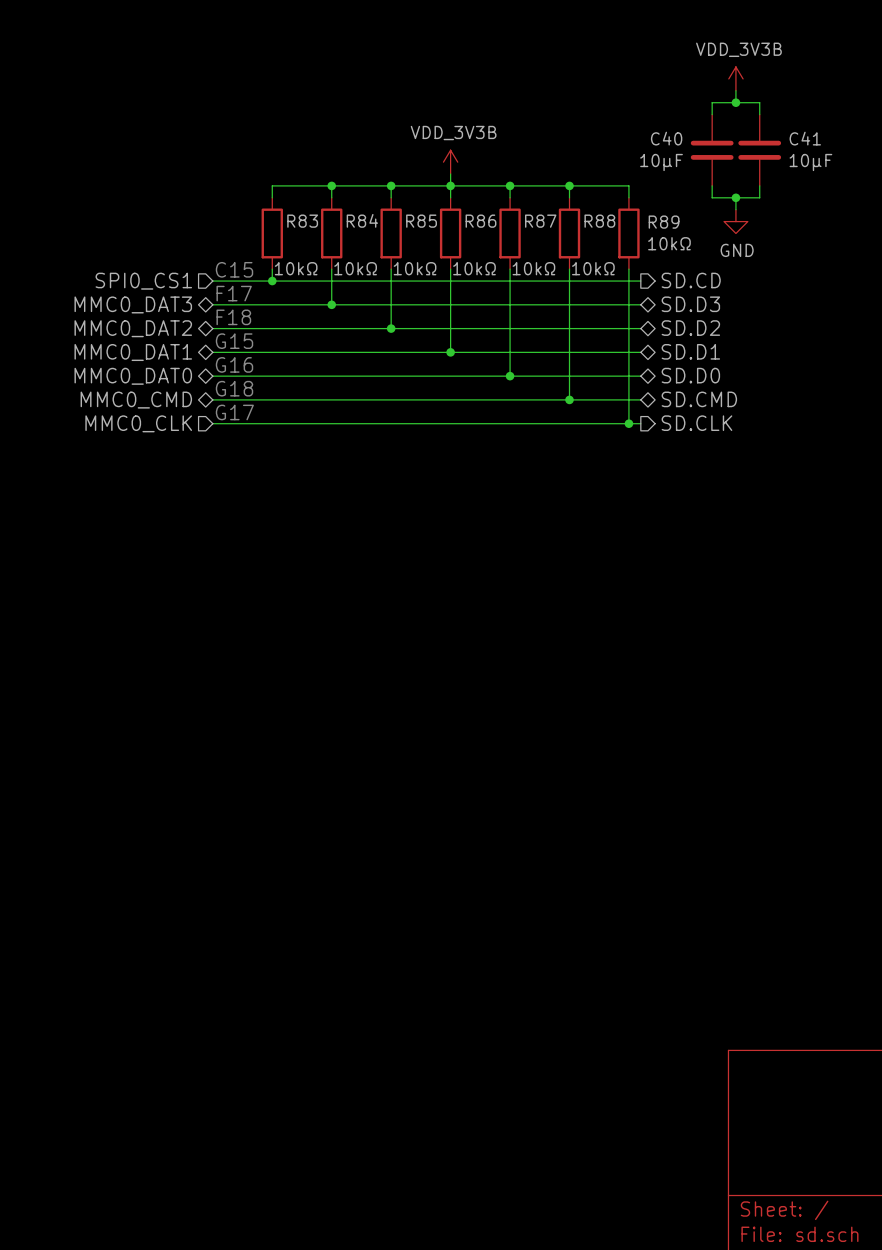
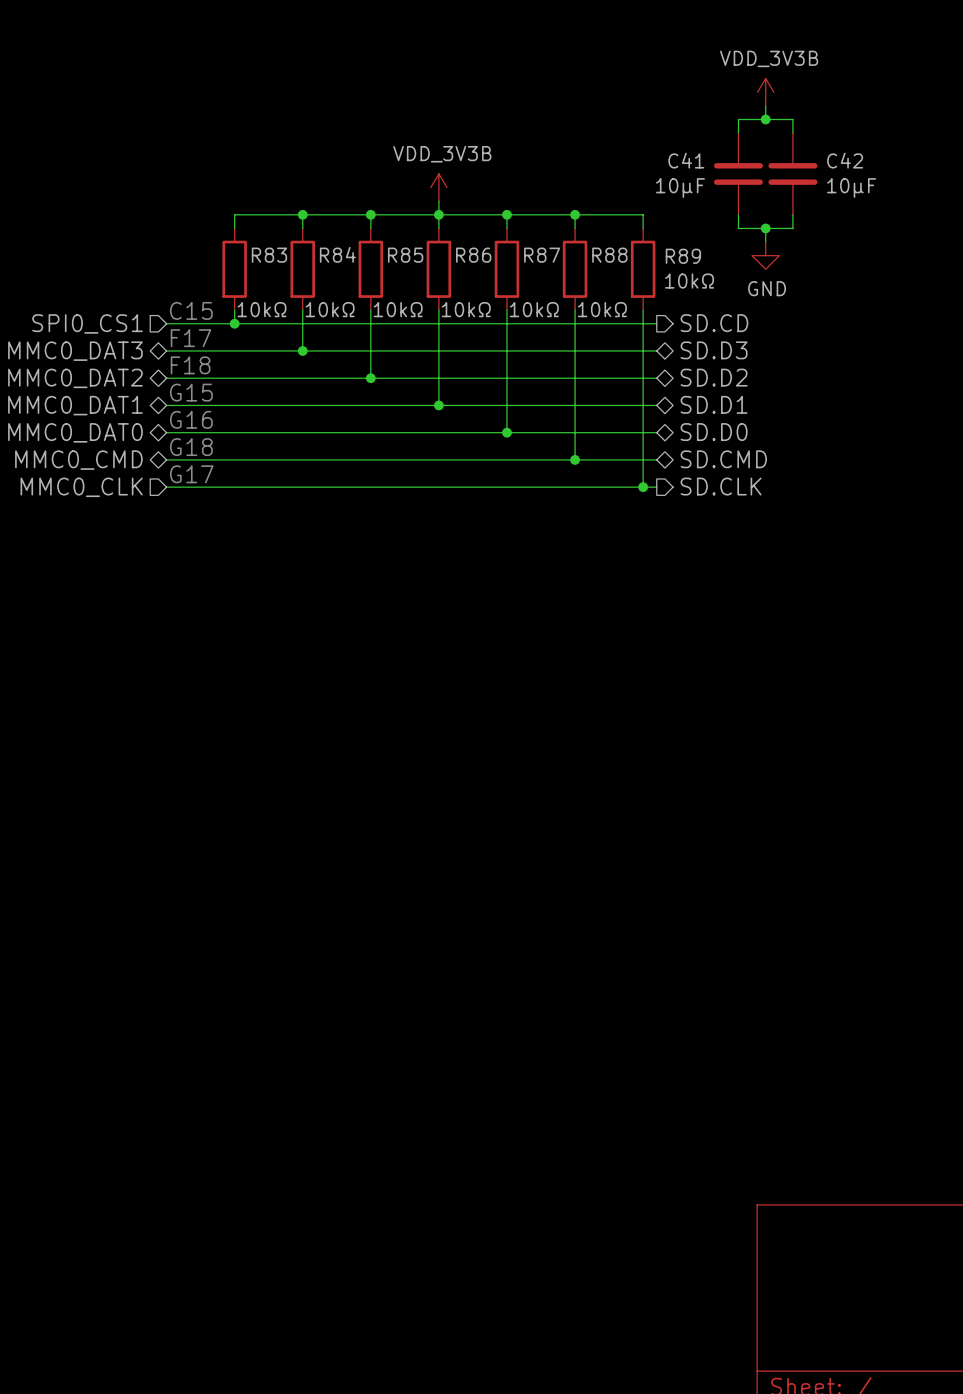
C40 name: C40 (666, 138) -> C41 (686, 160)
C41 name: C41 (805, 138) -> C42 (845, 160)

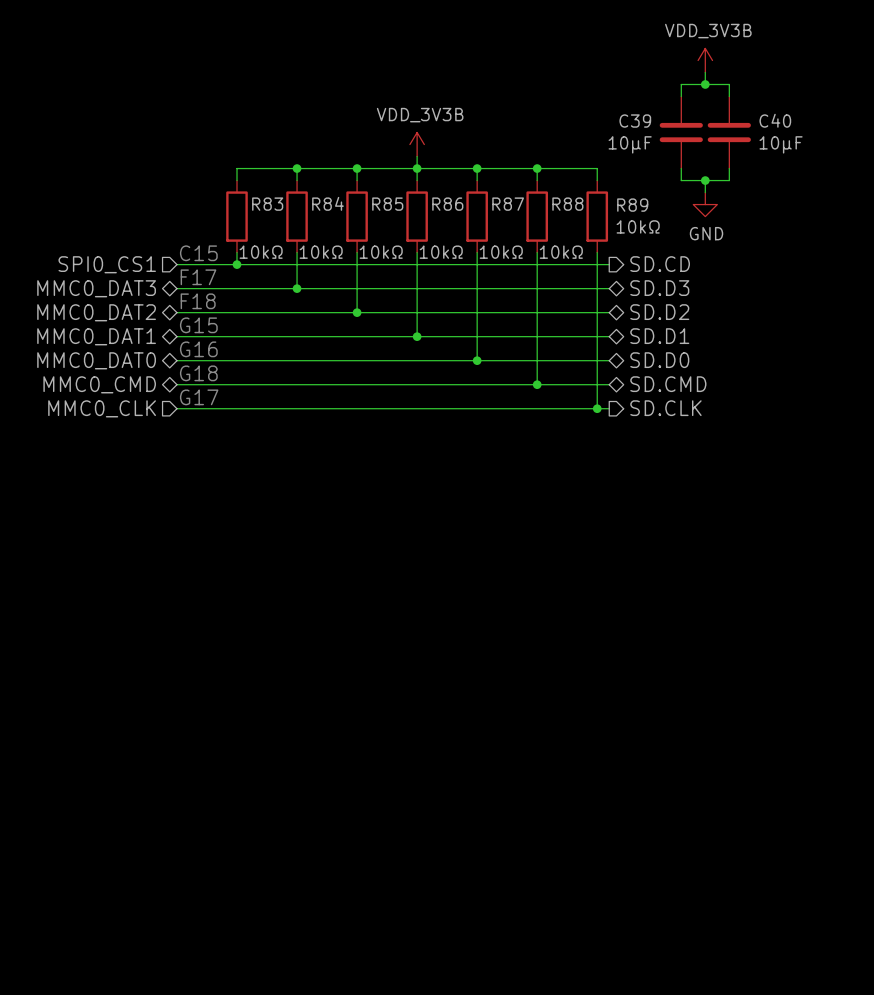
C41 name: C41 (686, 160) -> C39 (635, 121)
C42 name: C42 (845, 160) -> C40 (775, 120)

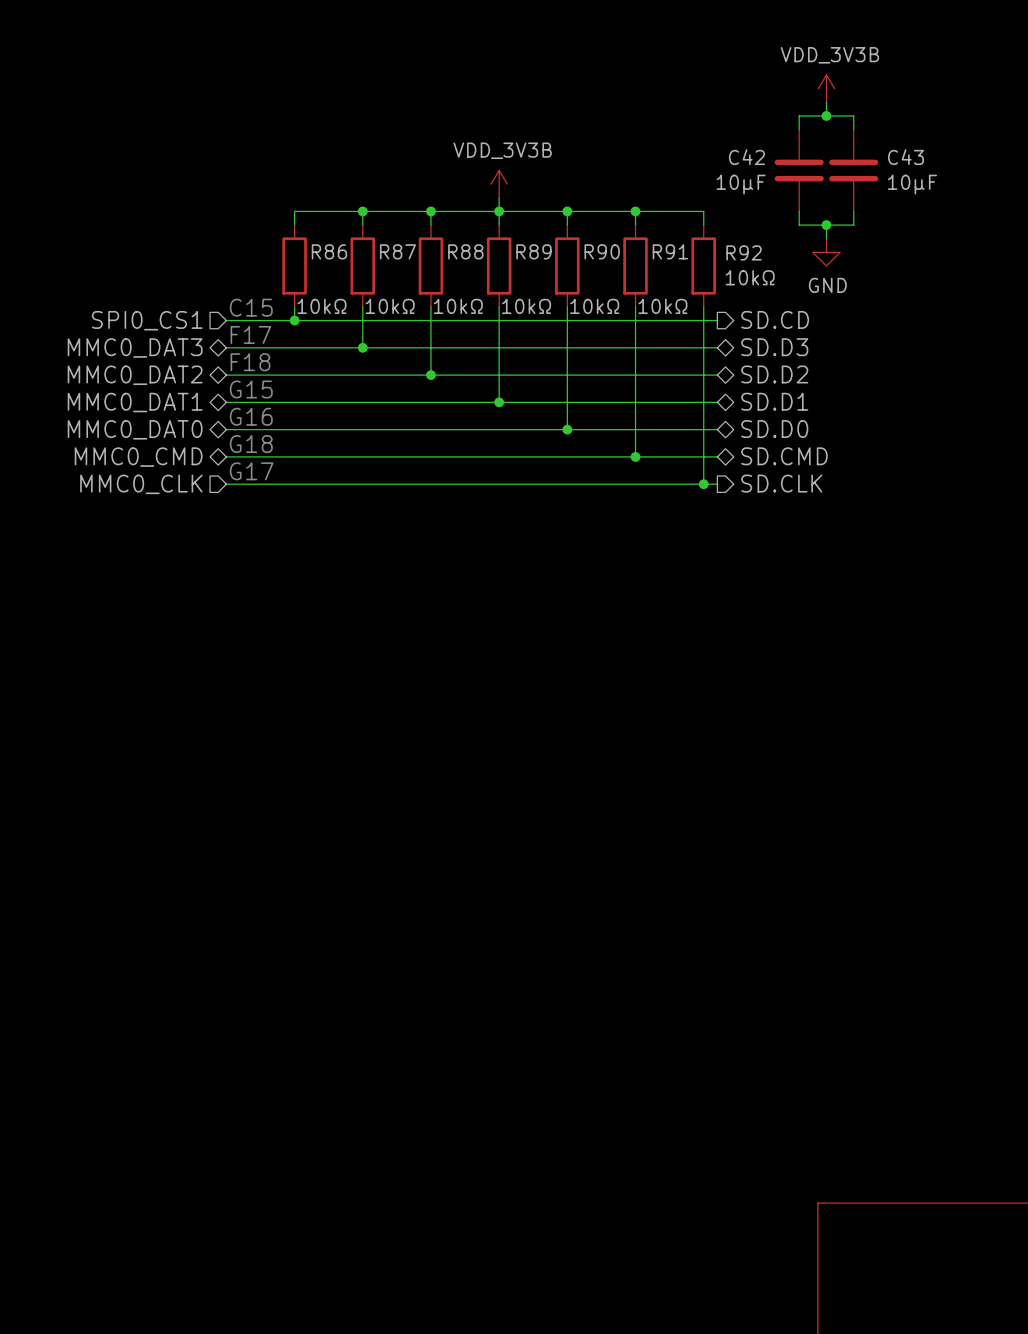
C40 name: C40 (775, 120) -> C43 (905, 157)
C39 name: C39 (635, 121) -> C42 (746, 157)
R84 name: R84 (328, 203) -> R87 (397, 251)
R83 name: R83 (267, 204) -> R86 (329, 251)
R85 name: R85 (387, 204) -> R88 (465, 251)
R86 name: R86 (447, 204) -> R89 (534, 251)
R87 name: R87 (508, 204) -> R90 (602, 251)
R88 name: R88 (567, 204) -> R91 (670, 251)
R89 name: R89 (632, 205) -> R92 (744, 252)

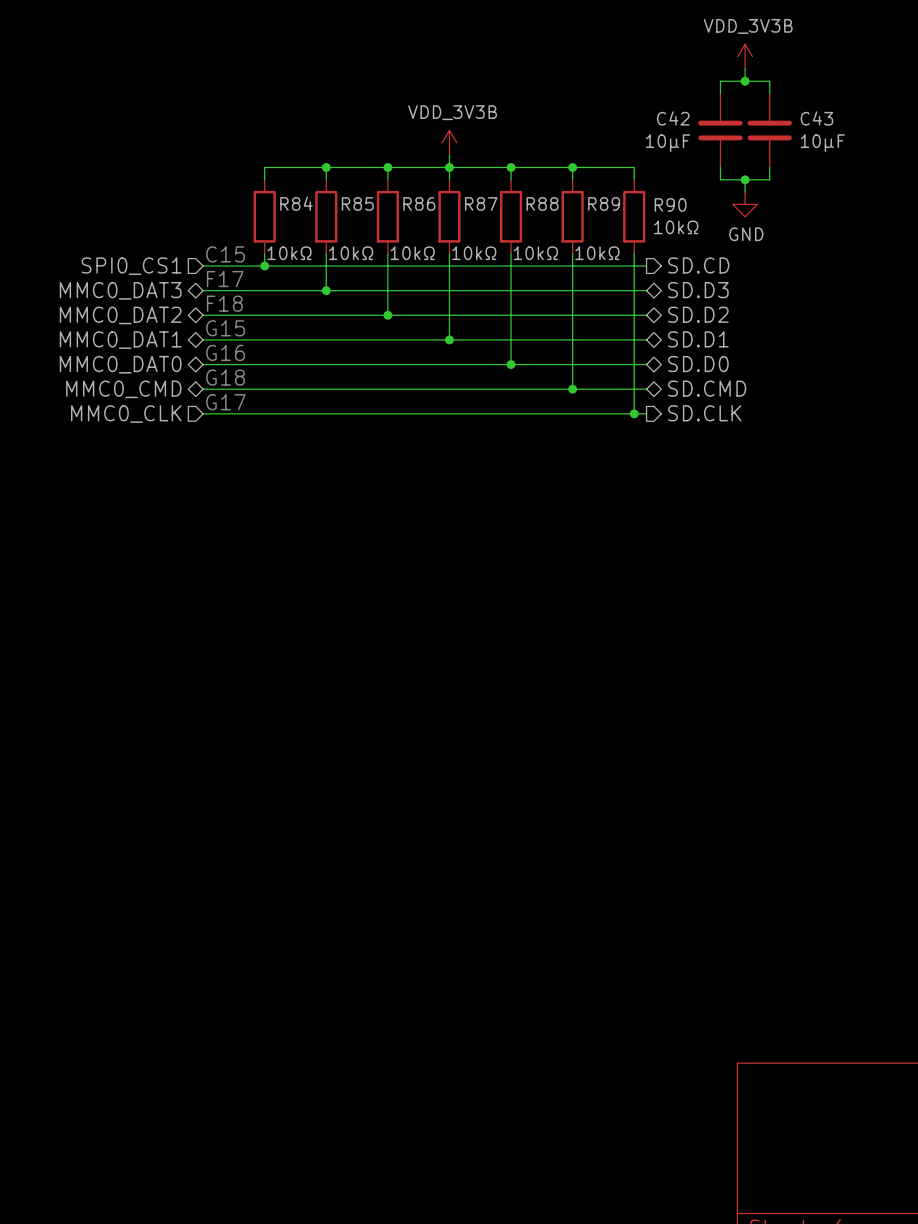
R86 name: R86 (329, 251) -> R84 (296, 203)
R87 name: R87 (397, 251) -> R85 (357, 203)
R88 name: R88 (465, 251) -> R86 (419, 203)
R89 name: R89 (534, 251) -> R87 (481, 203)
R90 name: R90 (602, 251) -> R88 (542, 203)
R91 name: R91 (670, 251) -> R89 (604, 203)
R92 name: R92 (744, 252) -> R90 (670, 204)

